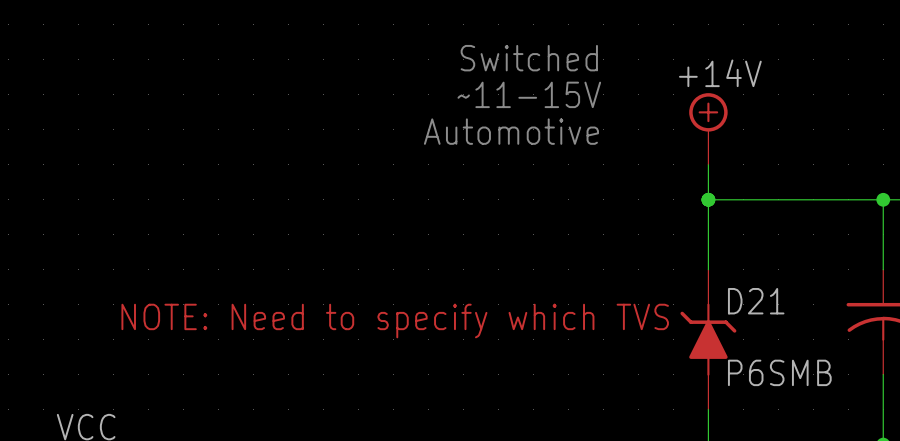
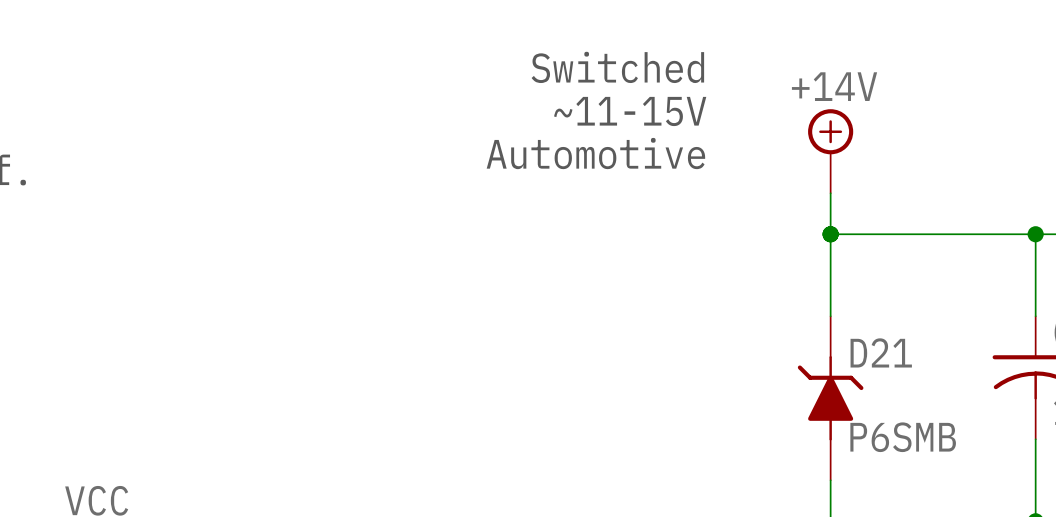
text: NOTE: Need to specify which TVS (395, 321) -> none

